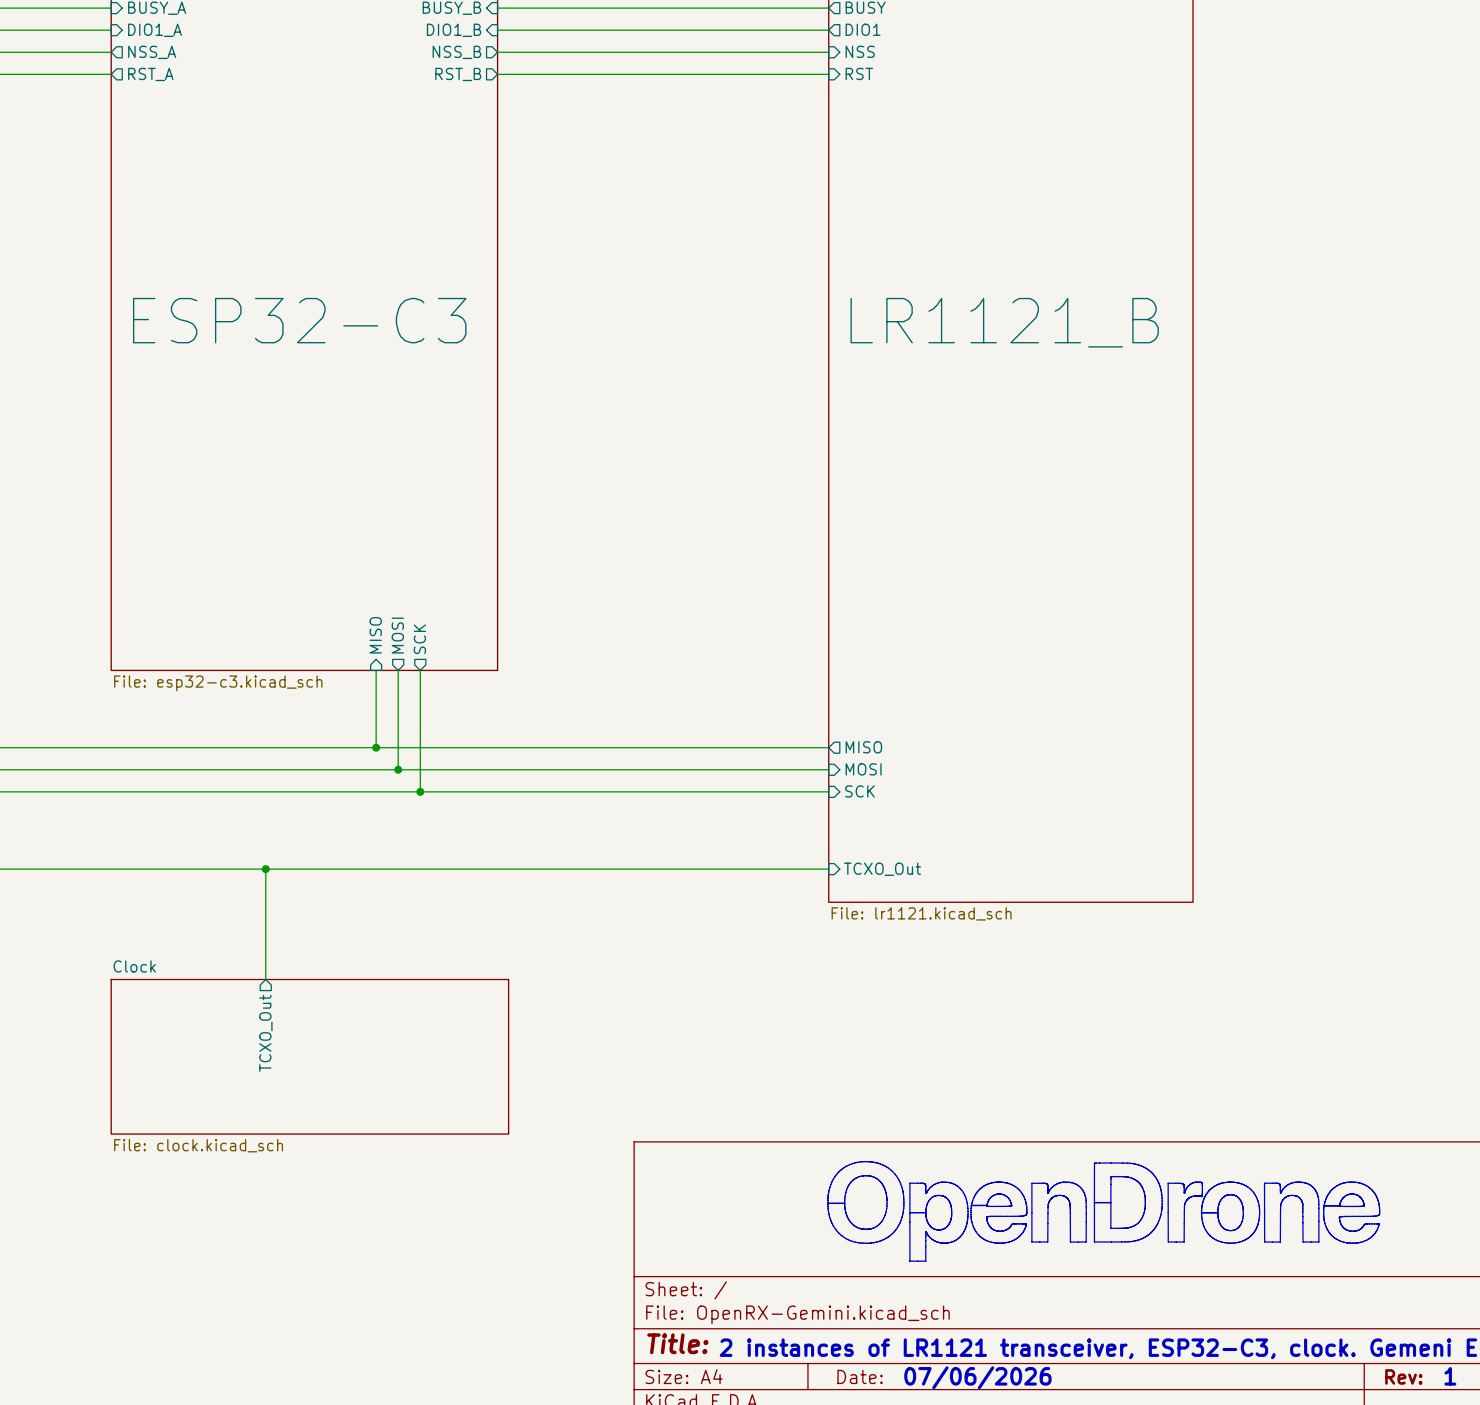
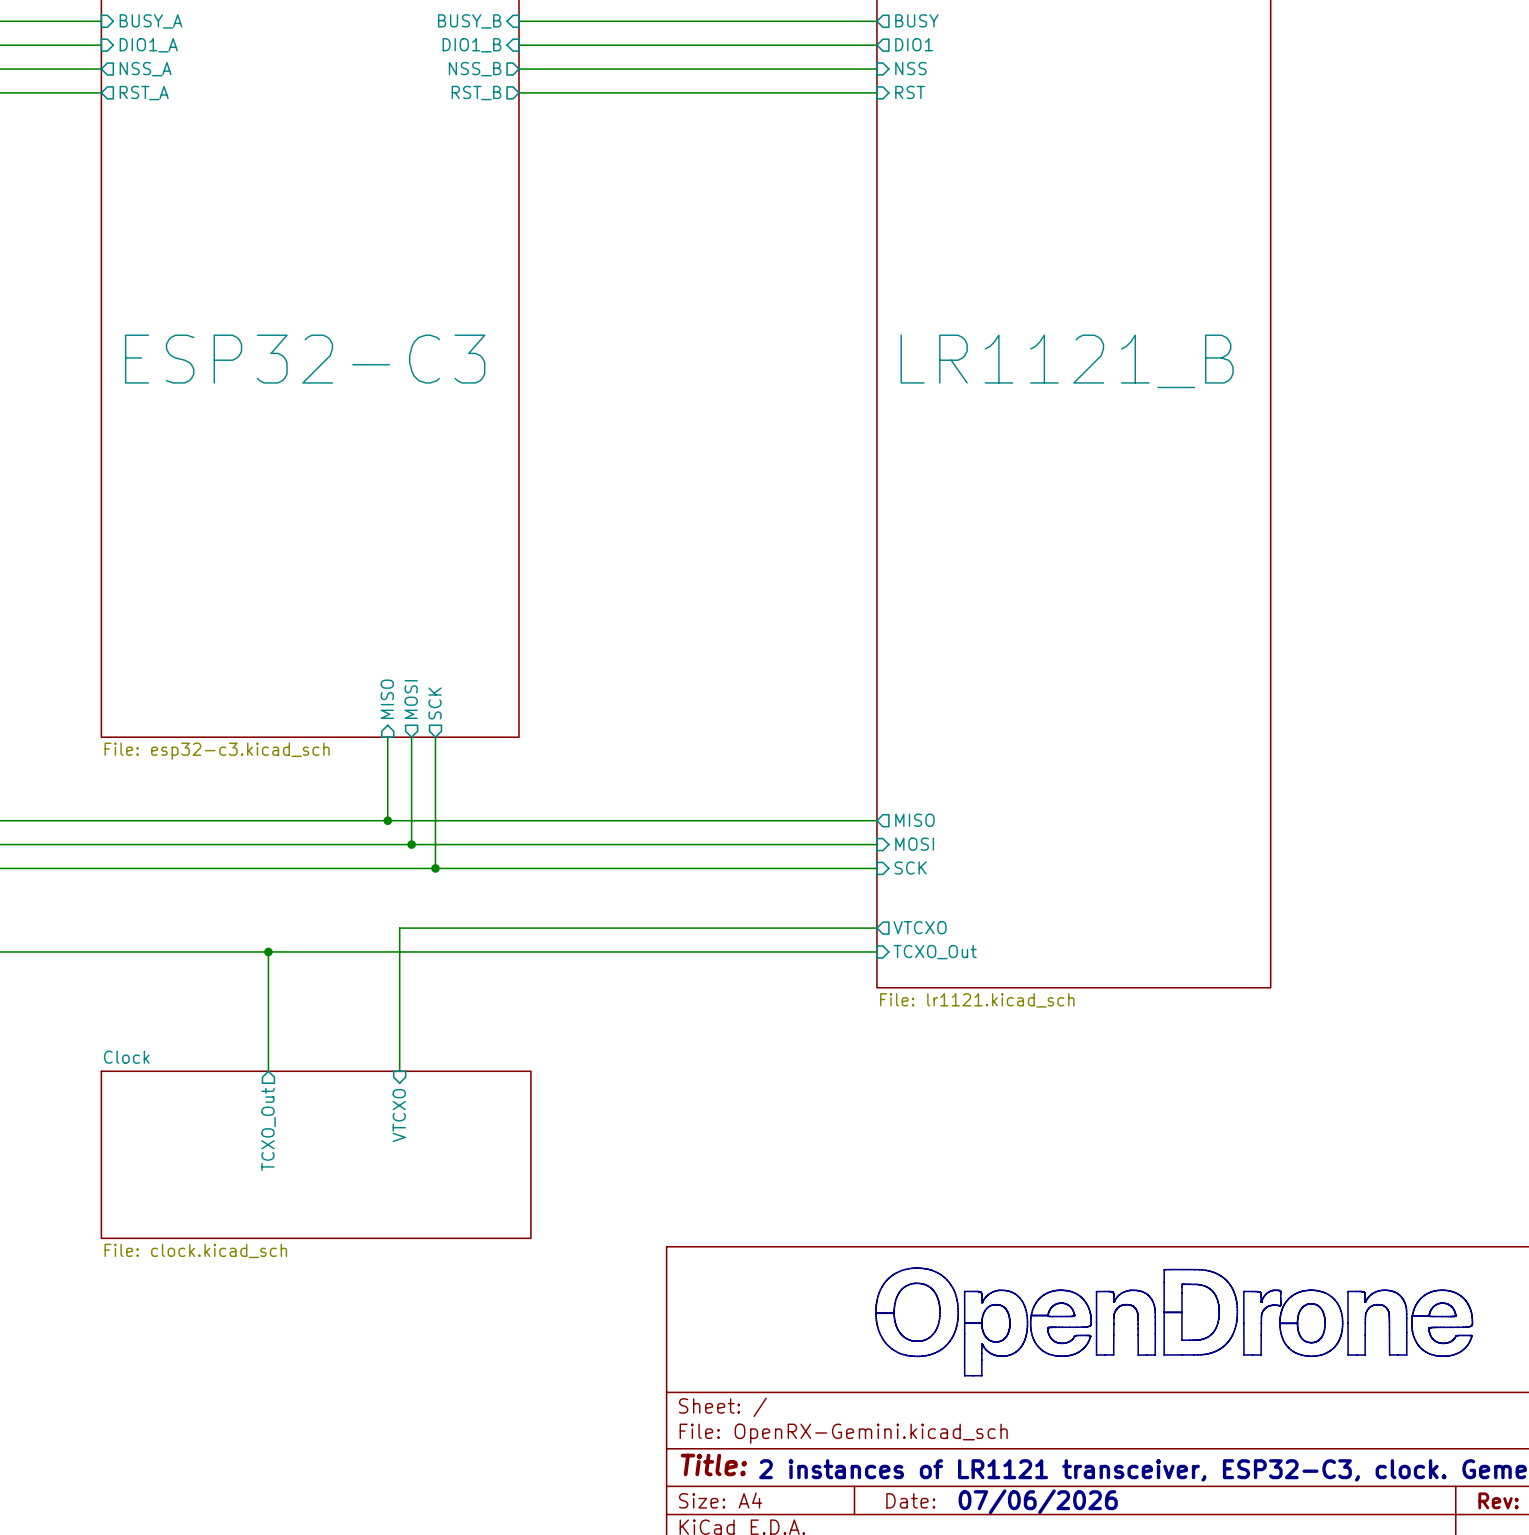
sheet pin: none -> VTCXO (920, 927)
wire: none -> (876, 928) (399, 928) (399, 1071)
sheet pin: none -> VTCXO (399, 1115)

